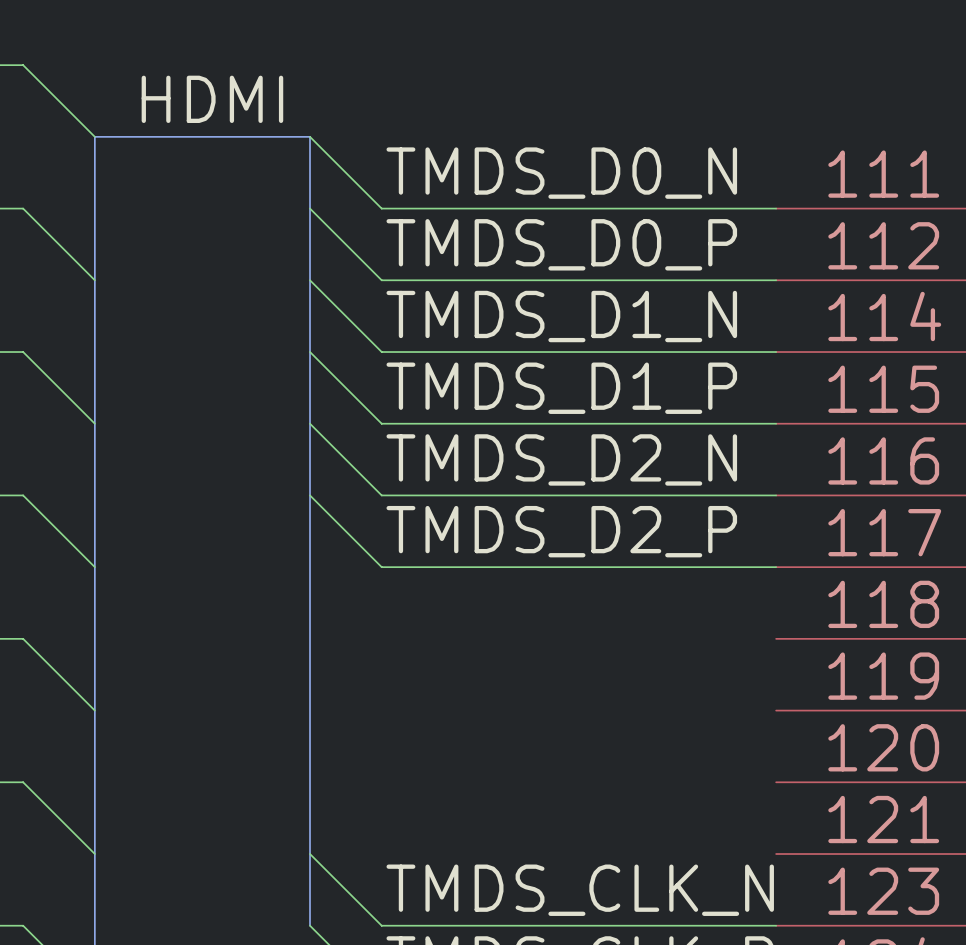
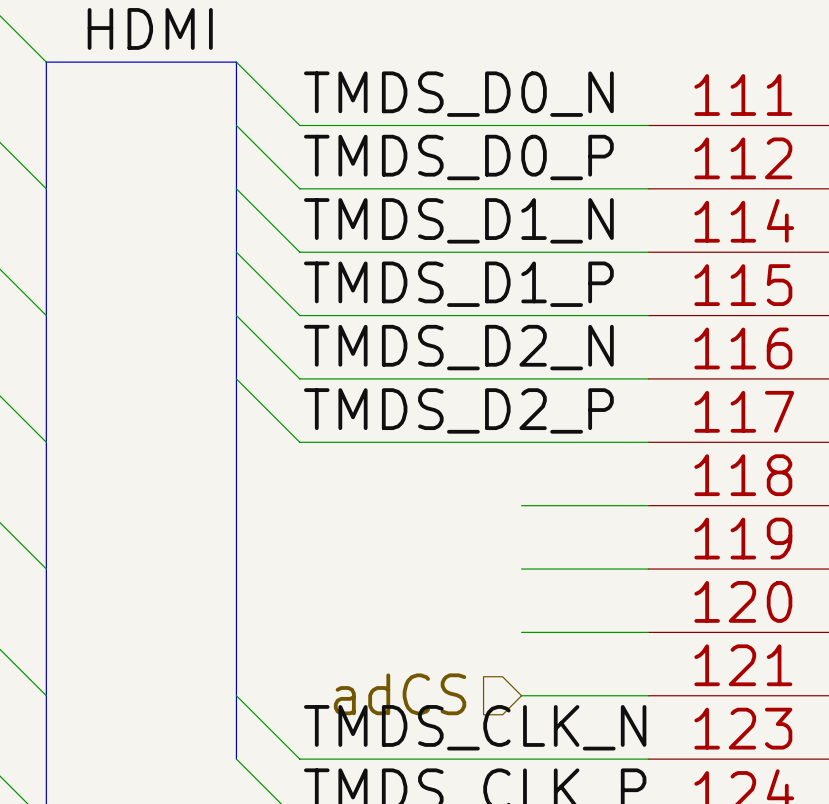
wire: none -> (521, 505) (648, 505)
wire: none -> (521, 569) (648, 569)
wire: none -> (521, 632) (648, 632)
hierarchical label: none -> adCS (400, 694)
wire: none -> (521, 695) (648, 695)

